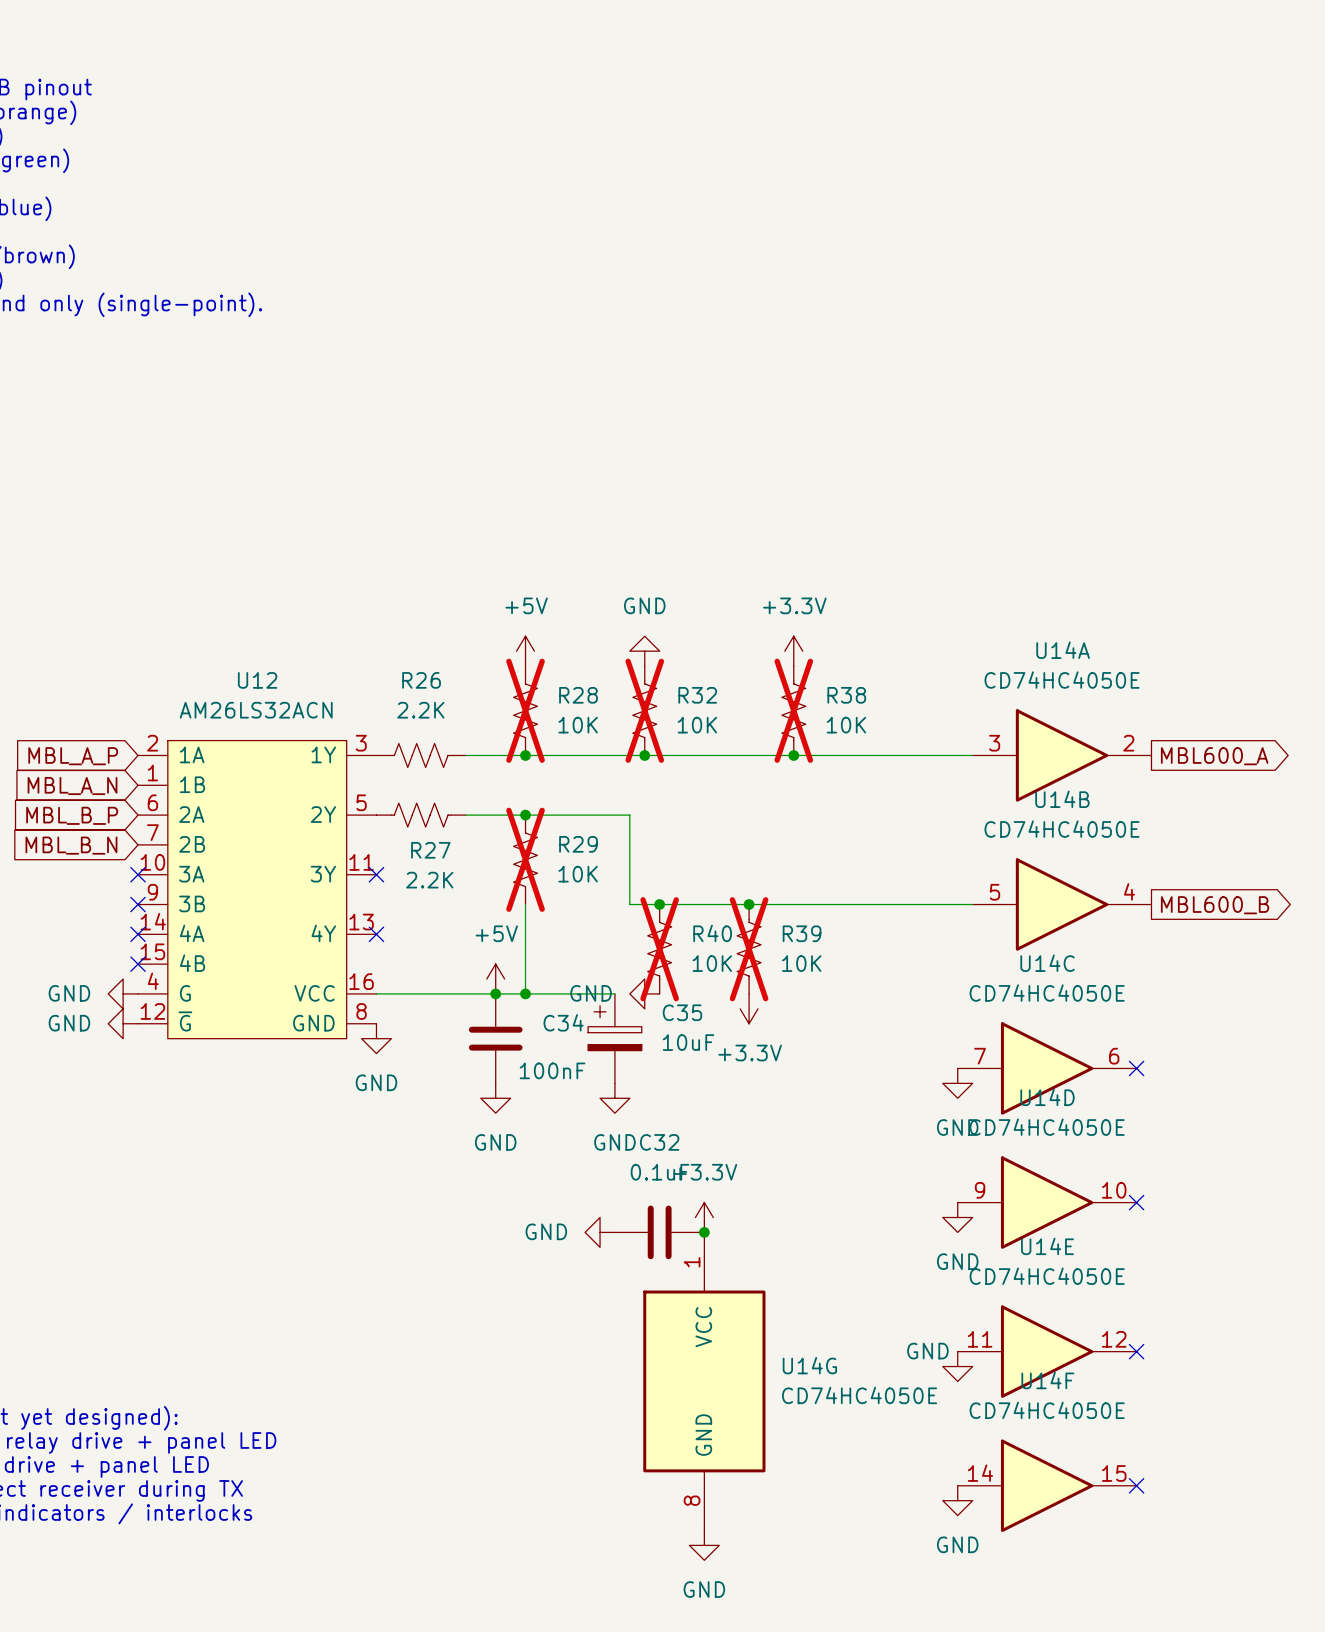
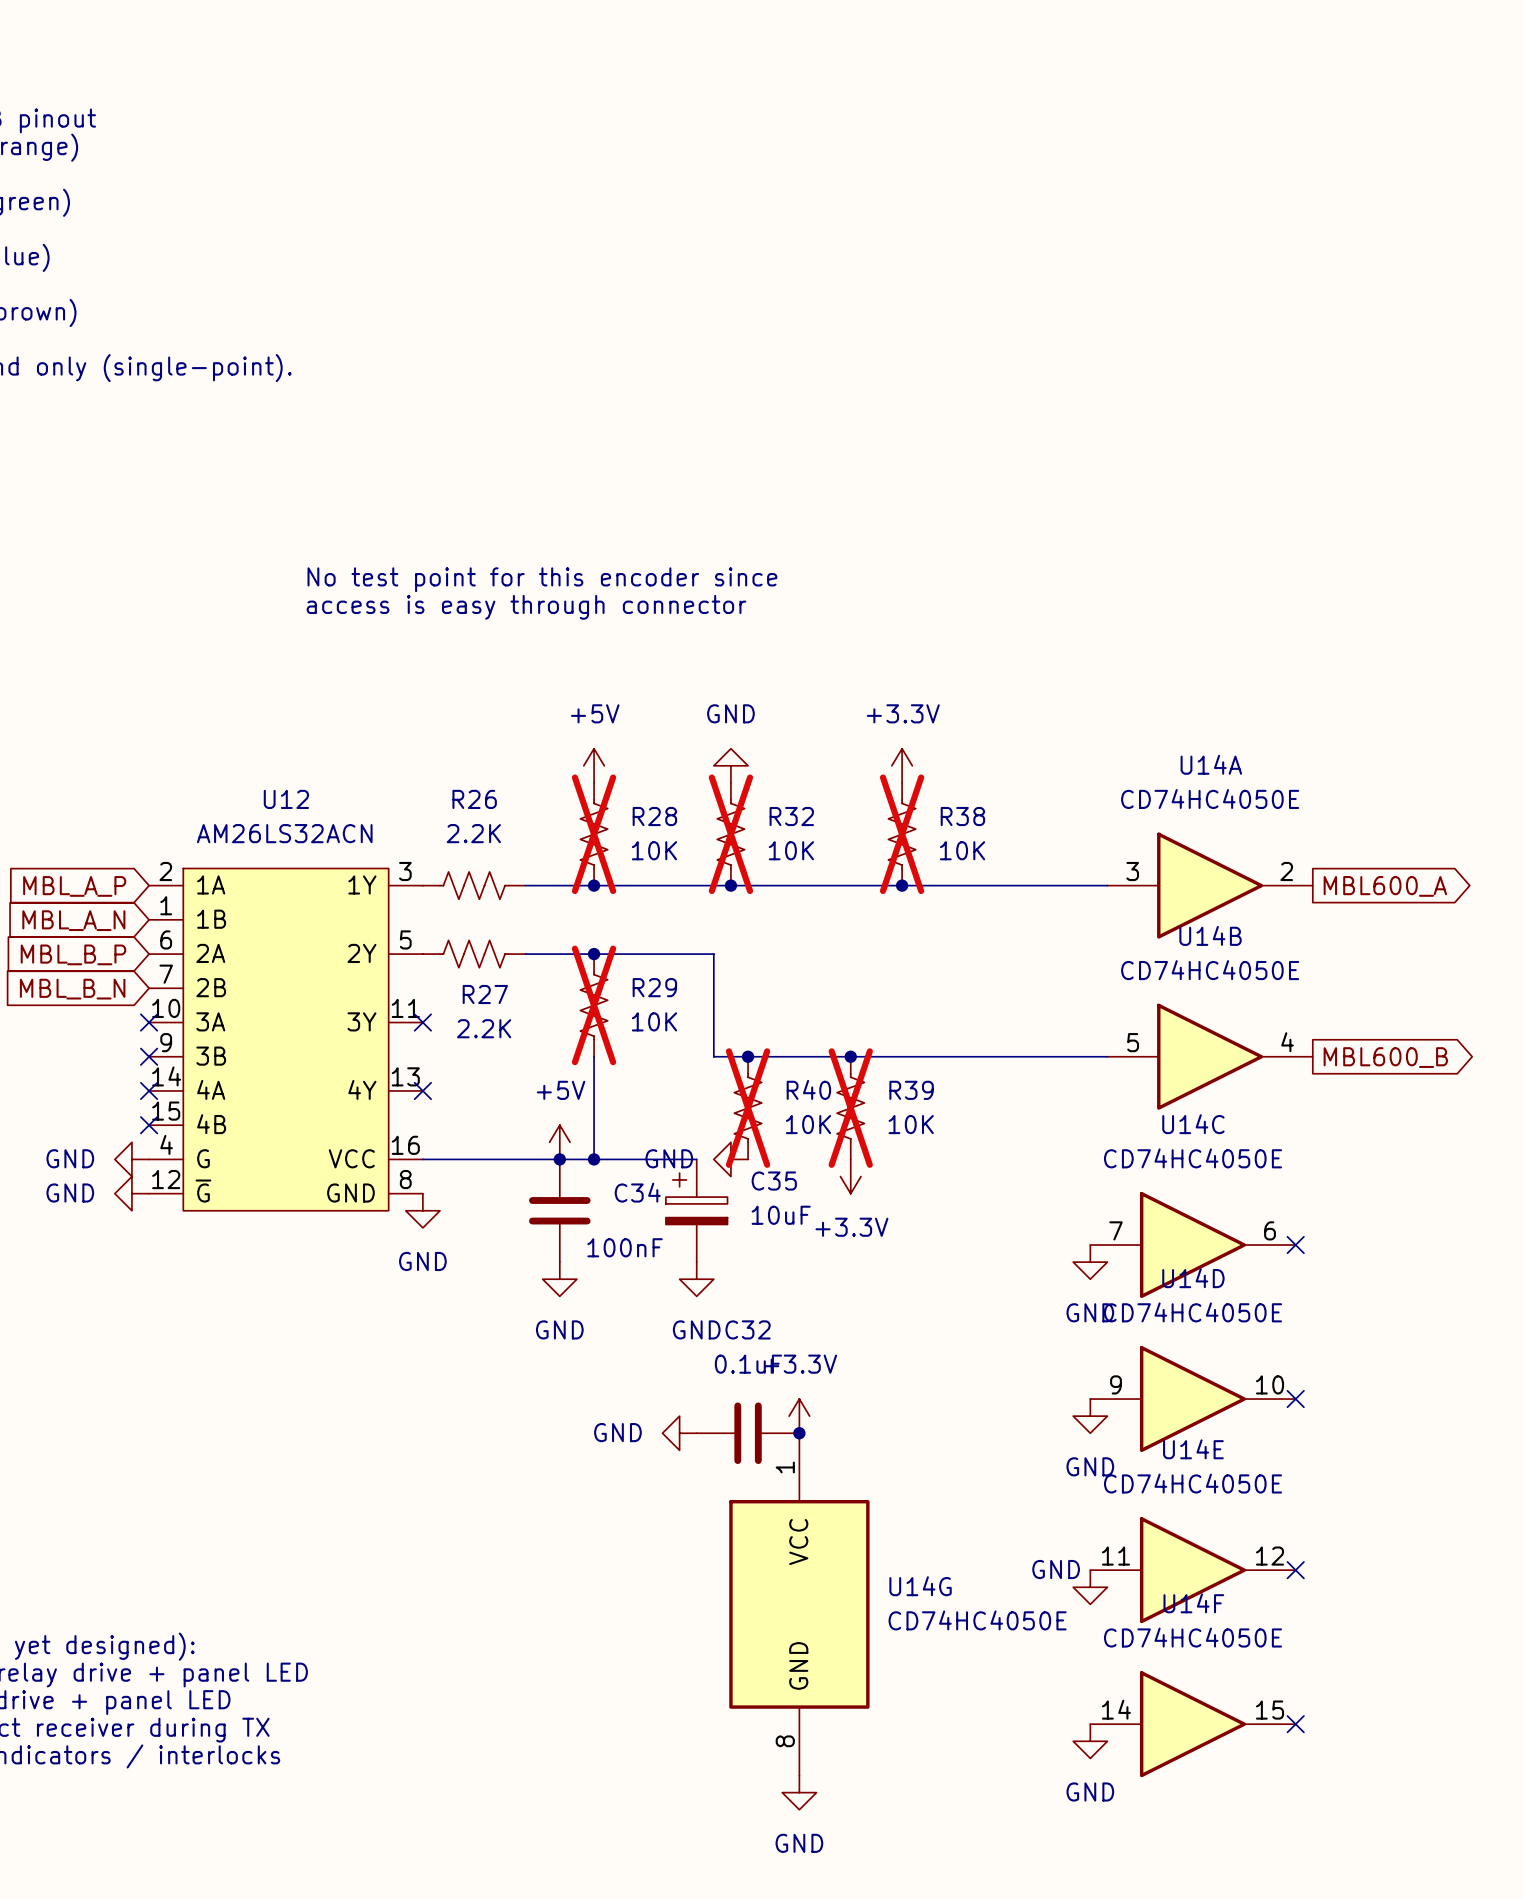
text: none -> No test point for this encoder since (542, 579)
text: none -> access is easy through connector (526, 607)

